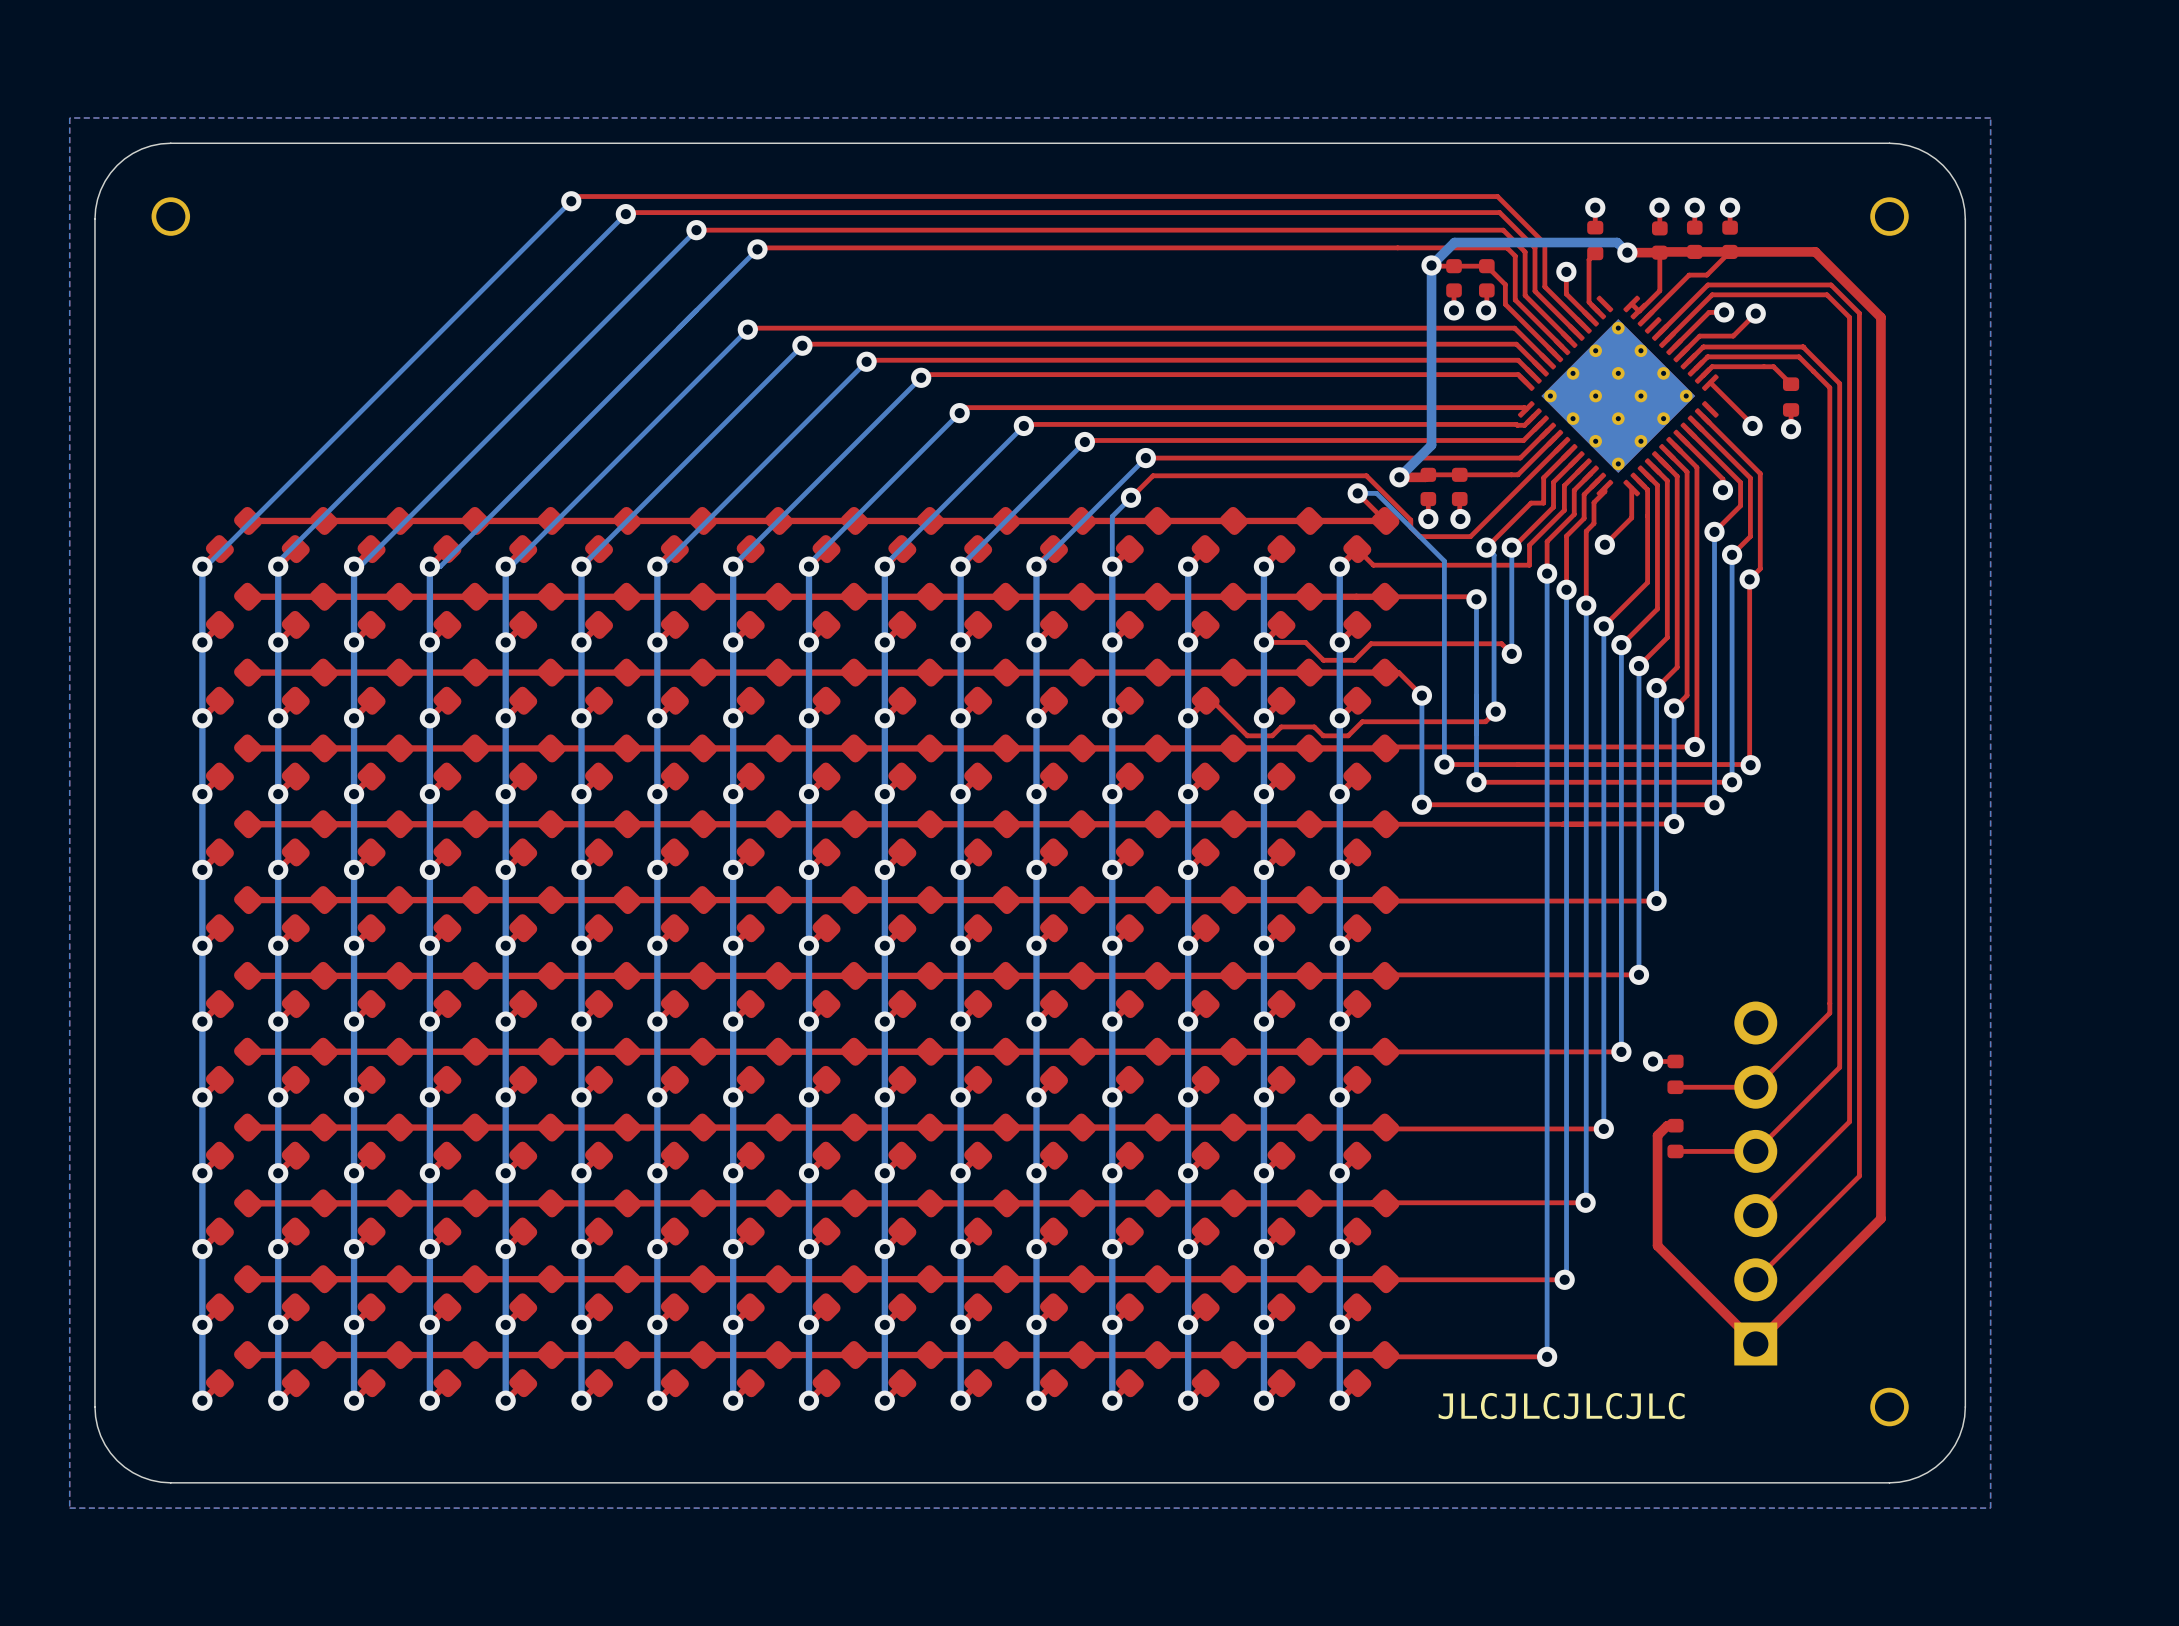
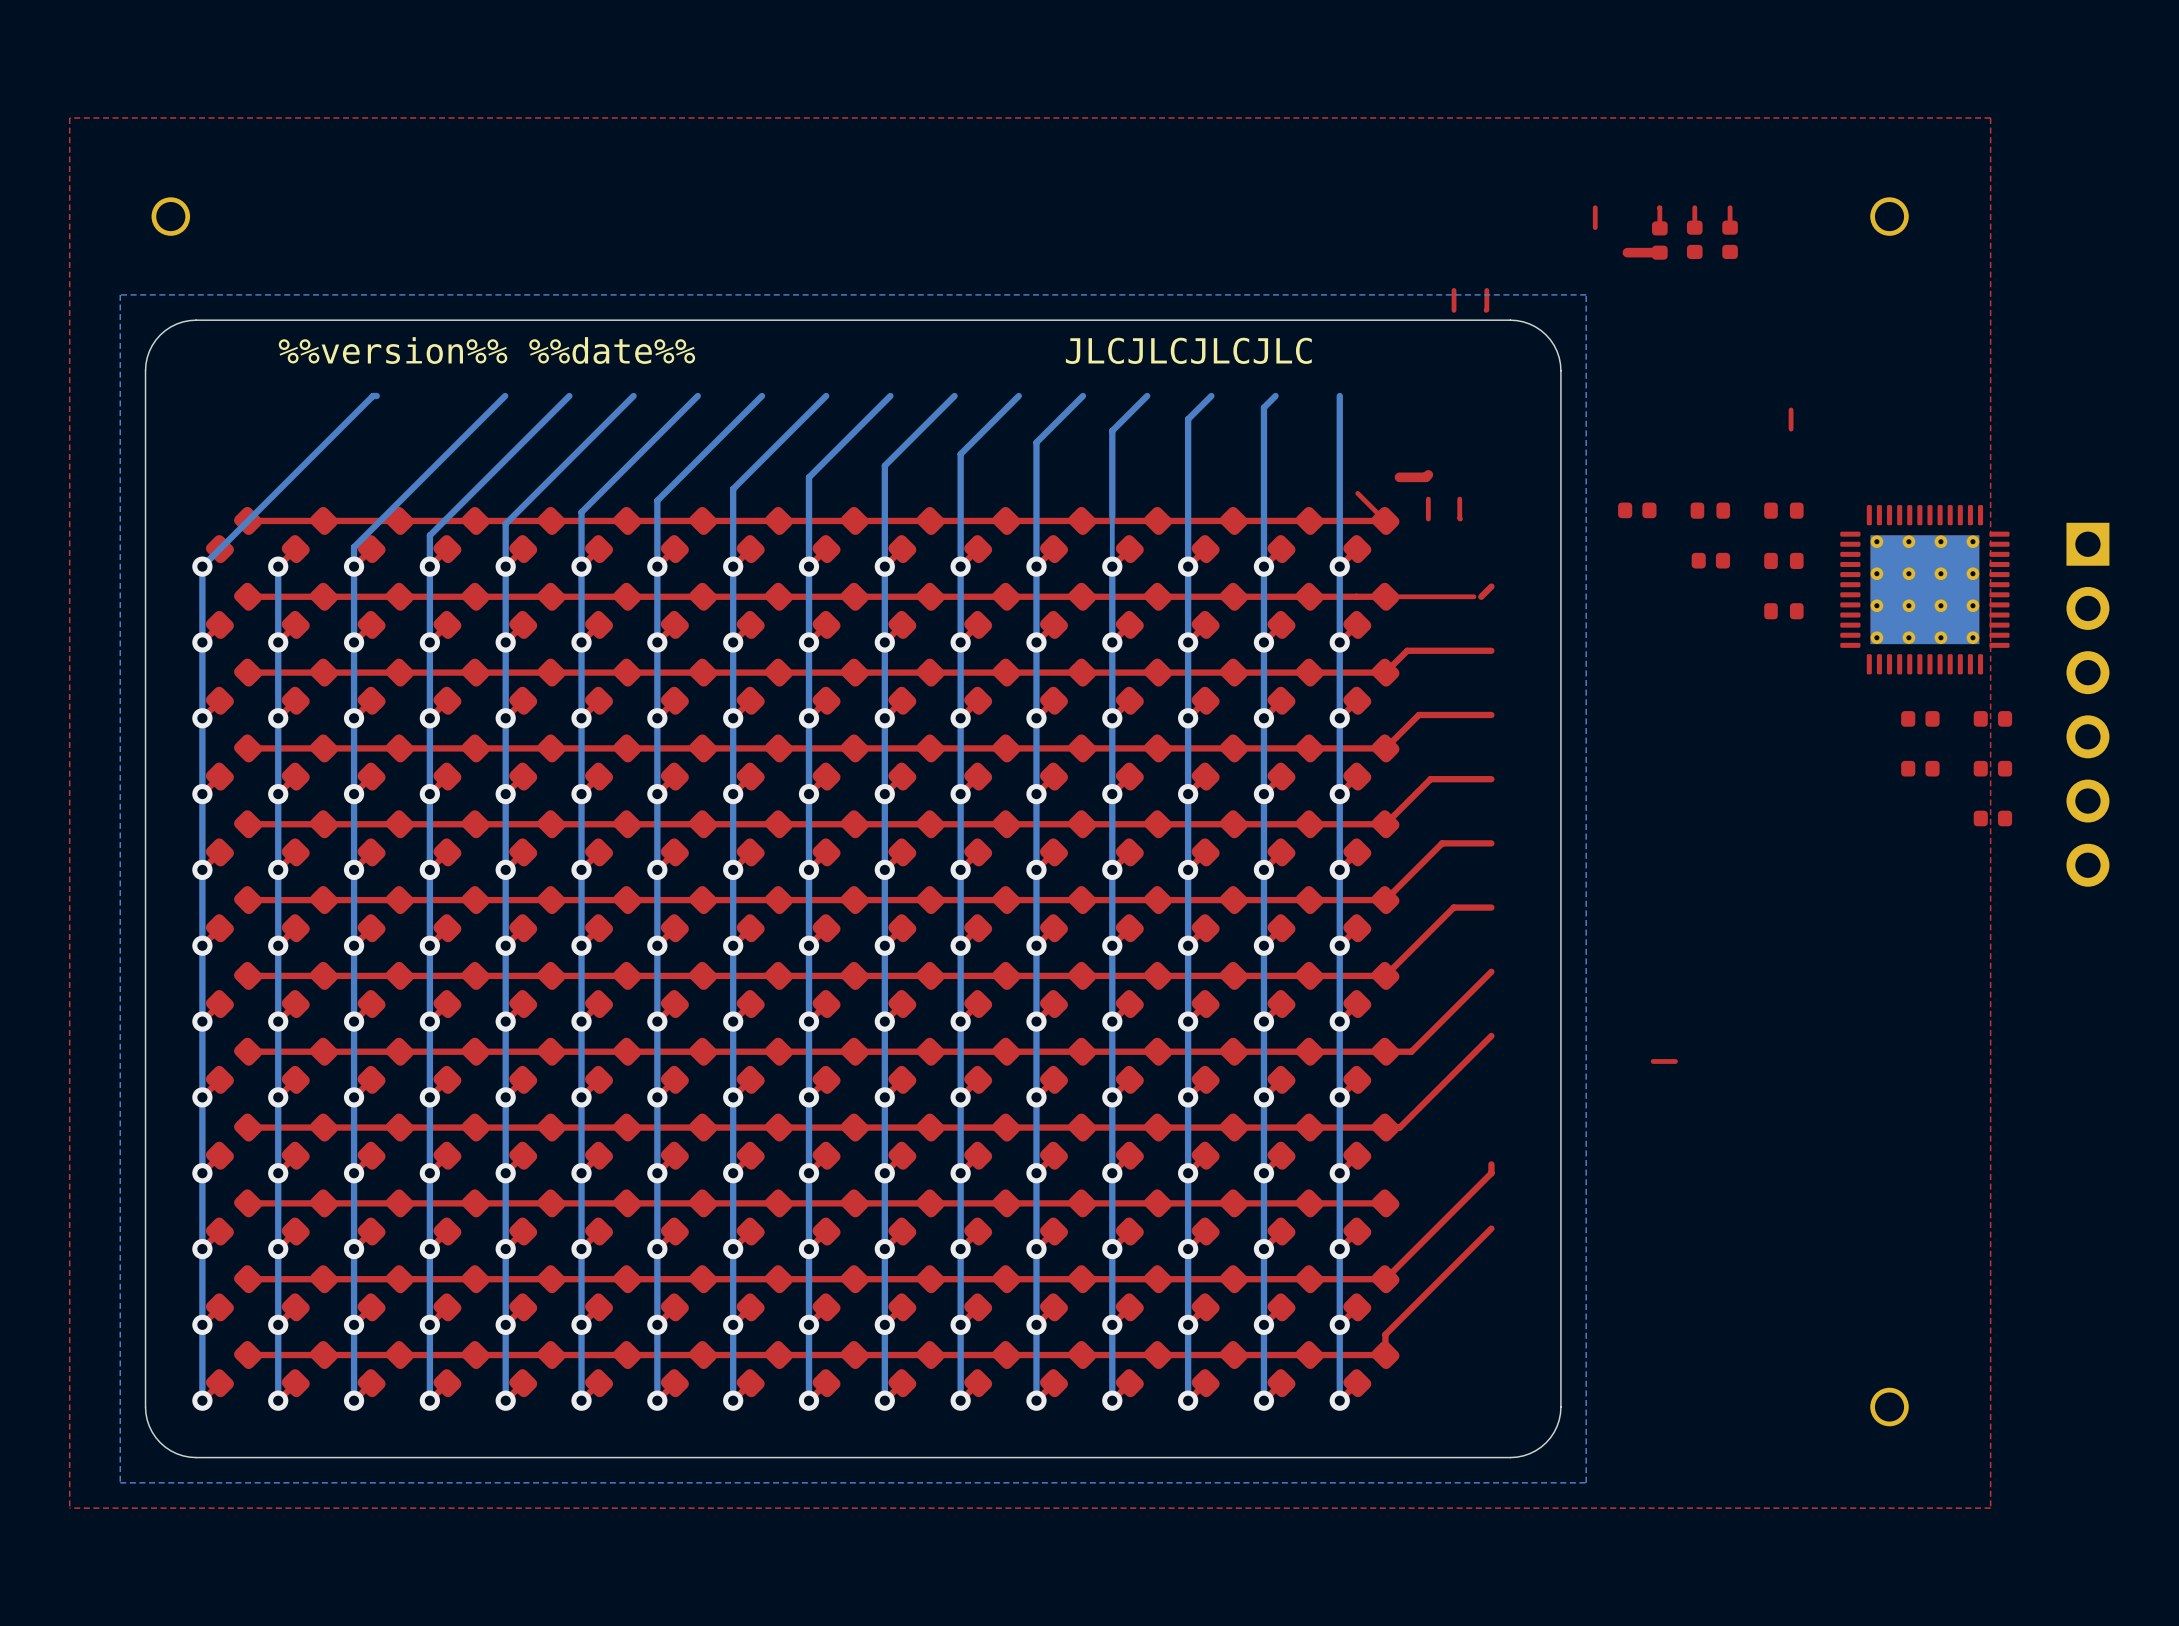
bottom zone outline: (1990, 117) (1990, 1508) (69, 1508) (69, 117) (1990, 117) -> (1586, 294) (1586, 1482) (120, 1482) (120, 294) (1586, 294)
board edge: (1889, 143) (170, 143) (151, 145) (124, 158) (105, 181) (97, 199) (94, 219) (94, 1407) (97, 1426) (110, 1453) (132, 1472) (151, 1480) (170, 1482) (1889, 1482) (1909, 1480) (1935, 1467) (1955, 1444) (1962, 1426) (1965, 1407) (1965, 219) (1959, 190) (1943, 165) (1918, 149) (1889, 143) -> (1510, 320) (1529, 324) (1546, 334) (1557, 351) (1560, 370) (1560, 1407) (1559, 1420) (1554, 1432) (1541, 1447) (1529, 1453) (1510, 1457) (196, 1457) (182, 1455) (170, 1450) (155, 1437) (149, 1426) (145, 1407) (145, 370) (149, 351) (155, 339) (165, 330) (182, 321) (196, 320) (1510, 320)
top track: (571, 201) (576, 196) (1497, 196) (1544, 243) (1544, 286) (1583, 325) -> none
bottom track: (571, 201) (205, 566) (202, 566) -> (376, 396) (373, 396) (202, 566)
via: (571, 201) -> none
via: (1595, 207) -> none
via: (1659, 207) -> none
via: (1694, 207) -> none
via: (1730, 207) -> none
top track: (625, 214) (627, 212) (1499, 212) (1534, 247) (1534, 291) (1576, 332) -> none
bottom track: (625, 214) (278, 561) (279, 566) -> none
via: (625, 214) -> none
top track: (696, 230) (1503, 230) (1525, 251) (1525, 295) (1569, 339) -> none
bottom track: (696, 230) (360, 566) (354, 566) -> (505, 396) (354, 547) (354, 566)
via: (696, 230) -> none
part: (1595, 240) -> none
top track: (757, 249) (758, 247) (1507, 247) (1515, 256) (1515, 299) (1562, 346) -> none
bottom track: (757, 249) (440, 566) (429, 566) -> (569, 396) (429, 535) (429, 566)
via: (757, 249) -> none
top track: (1730, 251) (1706, 275) (1689, 275) (1646, 318) -> none
bottom track: (1627, 252) (1617, 242) (1454, 242) (1431, 265) (1431, 445) (1399, 477) -> none
via: (1627, 252) -> none
top track: (1595, 253) (1589, 259) (1589, 302) (1597, 310) -> none
top track: (1431, 265) (1486, 266) (1505, 284) (1505, 304) (1554, 353) -> none
via: (1431, 265) -> none
top track: (1566, 271) (1566, 294) (1590, 318) -> none
via: (1566, 271) -> none
part: (1454, 278) -> none
part: (1486, 278) -> none
top track: (1631, 303) (1639, 311) (1659, 290) (1660, 251) (1815, 251) (1880, 317) (1880, 1218) (1755, 1344) (1657, 1245) (1657, 1135) (1667, 1125) (1675, 1125) -> none
via: (1454, 310) -> none
via: (1486, 310) -> none
top track: (1724, 312) (1709, 312) (1674, 346) -> none
via: (1724, 312) -> none
top track: (1755, 313) (1733, 336) (1699, 336) (1681, 354) -> none
via: (1755, 313) -> none
top track: (747, 329) (749, 328) (1514, 328) (1547, 361) -> none
bottom track: (747, 329) (510, 566) (505, 566) -> (633, 396) (505, 523) (505, 566)
via: (747, 329) -> none
top track: (1660, 332) (1707, 284) (1831, 284) (1859, 313) (1859, 1176) (1755, 1279) -> none
top track: (1667, 339) (1712, 294) (1827, 294) (1849, 317) (1849, 1121) (1755, 1215) -> none
top track: (802, 345) (803, 344) (1516, 344) (1540, 368) -> none
bottom track: (802, 345) (581, 566) -> (697, 396) (581, 512) (581, 566)
via: (802, 345) -> none
top track: (1803, 346) (1703, 346) (1689, 361) -> none
top track: (1803, 346) (1839, 383) (1839, 1067) (1755, 1151) (1675, 1151) -> none
text: none -> %%version%% %%date%% (486, 350)
text: none -> JLCJLCJLCJLC (1188, 350)
top track: (866, 361) (868, 360) (1518, 360) (1533, 375) -> none
bottom track: (866, 361) (661, 566) (657, 566) -> (761, 396) (657, 500) (657, 566)
via: (866, 361) -> none
top track: (1696, 368) (1707, 356) (1799, 356) (1829, 387) (1829, 1013) (1755, 1087) (1676, 1086) -> none
top track: (1703, 375) (1712, 366) (1773, 366) (1791, 384) -> none
top track: (921, 377) (924, 374) (1518, 374) (1526, 382) -> none
bottom track: (921, 377) (733, 565) -> (826, 396) (733, 489) (733, 566)
via: (921, 377) -> none
top track: (1710, 382) (1752, 425) -> none
bottom track: none -> (1018, 396) (960, 454) (960, 563)
bottom track: none -> (1211, 396) (1188, 419) (1188, 566)
bottom track: none -> (1275, 396) (1263, 407) (1263, 566)
bottom track: none -> (1339, 396) (1339, 566)
part: (1618, 396) -> none
part: (1791, 397) -> none
top track: (1526, 409) (1524, 407) (965, 407) (959, 413) -> none
bottom track: (959, 413) (809, 563) -> (890, 396) (809, 477) (809, 563)
via: (959, 413) -> none
top track: (1533, 416) (1524, 425) (1025, 424) (1023, 425) -> none
top track: (1703, 416) (1760, 473) (1760, 568) (1749, 579) (1750, 765) -> none
top track: (1540, 423) (1523, 440) (1086, 440) (1084, 442) -> none
top track: (1696, 423) (1750, 478) (1750, 536) (1732, 554) -> none
bottom track: (1023, 425) (884, 565) -> (954, 396) (884, 465) (884, 565)
via: (1023, 425) -> none
via: (1752, 425) -> none
via: (1791, 429) -> none
top track: (1547, 430) (1520, 458) (1145, 458) -> none
top track: (1688, 430) (1740, 482) (1740, 505) (1714, 531) -> none
top track: (1554, 438) (1517, 474) (1427, 475) -> none
top track: (1681, 438) (1722, 479) (1722, 490) -> none
bottom track: (1084, 442) (960, 566) -> none
via: (1084, 442) -> none
top track: (1562, 445) (1470, 536) (1419, 536) (1410, 527) (1410, 520) (1366, 475) (1152, 475) (1131, 497) -> none
top track: (1674, 445) (1696, 467) (1696, 744) (1694, 746) (1386, 746) -> (1491, 714) (1418, 714) (1386, 746)
top track: (1569, 452) (1543, 477) (1543, 503) (1531, 503) (1486, 547) -> none
top track: (1667, 452) (1687, 471) (1687, 695) (1674, 708) -> none
bottom track: (1145, 458) (1036, 566) -> (1082, 396) (1036, 442) (1036, 566)
via: (1145, 458) -> none
top track: (1576, 459) (1553, 482) (1553, 507) (1511, 547) -> none
top track: (1660, 459) (1677, 476) (1677, 667) (1656, 688) -> none
top track: (1583, 466) (1564, 485) (1564, 510) (1529, 545) (1529, 565) (1373, 565) (1357, 549) -> none
top track: (1653, 466) (1667, 480) (1667, 637) (1638, 666) -> none
top track: (1590, 473) (1574, 490) (1574, 514) (1547, 541) (1547, 573) -> none
top track: (1646, 473) (1657, 485) (1657, 609) (1621, 645) -> none
via: (1399, 477) -> none
top track: (1597, 480) (1584, 494) (1584, 518) (1566, 536) (1566, 589) -> none
top track: (1638, 481) (1647, 489) (1647, 582) (1603, 626) -> none
part: (1428, 486) -> none
part: (1459, 486) -> none
top track: (1604, 488) (1604, 491) (1593, 502) (1593, 523) (1586, 531) (1586, 605) -> none
top track: (1631, 488) (1631, 517) (1604, 544) -> none
via: (1722, 490) -> none
bottom track: (1357, 493) (1376, 493) (1444, 561) (1444, 764) -> none
via: (1357, 493) -> none
bottom track: (1131, 497) (1112, 516) -> (1147, 396) (1112, 430) (1112, 516)
via: (1131, 497) -> none
part: none -> (1637, 510)
part: none -> (1710, 510)
part: none -> (1783, 510)
via: (1428, 519) -> none
via: (1460, 519) -> none
bottom track: (1714, 531) (1714, 805) -> none
via: (1714, 531) -> none
via: (1604, 544) -> none
bottom track: (1486, 547) (1494, 555) (1494, 709) (1495, 711) -> none
via: (1486, 547) -> none
bottom track: (1511, 547) (1511, 653) -> none
via: (1511, 547) -> none
bottom track: (1732, 554) (1732, 782) -> none
via: (1732, 554) -> none
part: none -> (1710, 560)
part: none -> (1783, 560)
bottom track: (1547, 573) (1547, 1356) -> none
via: (1547, 573) -> none
via: (1749, 579) -> none
top track: none -> (1491, 586) (1481, 596)
bottom track: (1566, 589) (1566, 1277) (1564, 1279) -> none
via: (1566, 589) -> none
part: none -> (1924, 589)
bottom track: (1476, 599) (1476, 782) -> none
via: (1476, 599) -> none
bottom track: (1586, 605) (1585, 1202) -> none
via: (1586, 605) -> none
part: none -> (1783, 611)
bottom track: (1603, 626) (1603, 1128) -> none
via: (1603, 626) -> none
top track: (1263, 642) (1305, 642) (1323, 660) (1354, 660) (1371, 643) (1501, 643) (1511, 653) -> none
bottom track: (1621, 645) (1621, 1051) -> none
via: (1621, 645) -> none
via: (1511, 653) -> none
bottom track: (1638, 666) (1638, 974) -> none
via: (1638, 666) -> none
top track: (1385, 672) (1398, 672) (1421, 695) -> (1385, 672) (1407, 650) (1491, 650)
bottom track: (1656, 688) (1656, 901) -> none
via: (1656, 688) -> none
bottom track: (1421, 695) (1421, 804) -> none
via: (1421, 695) -> none
top track: (1205, 700) (1212, 700) (1247, 735) (1272, 735) (1281, 726) (1314, 726) (1323, 735) (1348, 735) (1362, 721) (1485, 721) (1495, 711) -> none
bottom track: (1674, 708) (1674, 823) -> none
via: (1674, 708) -> none
via: (1495, 711) -> none
part: none -> (1920, 718)
part: none -> (1992, 718)
via: (1694, 746) -> none
via: (1444, 764) -> none
top track: (1750, 764) (1442, 764) -> none
via: (1750, 765) -> none
part: none -> (1920, 768)
part: none -> (1992, 768)
via: (1476, 782) -> none
top track: (1732, 782) (1476, 782) -> none
via: (1732, 782) -> none
top track: (1421, 804) (1714, 805) -> none
via: (1421, 804) -> none
via: (1714, 805) -> none
part: none -> (1992, 818)
top track: (1674, 823) (1563, 823) -> none
via: (1674, 823) -> none
top track: (1585, 824) (1385, 824) -> (1491, 779) (1430, 779) (1385, 824)
top track: (1385, 900) (1656, 901) -> (1385, 900) (1442, 843) (1491, 843)
via: (1656, 901) -> none
top track: none -> (1491, 907) (1453, 907) (1385, 975)
top track: none -> (1491, 971) (1411, 1051) (1387, 1051)
top track: (1638, 974) (1386, 974) -> none
via: (1638, 974) -> none
top track: (1621, 1051) (1385, 1051) -> none
via: (1621, 1051) -> none
via: (1653, 1061) -> none
part: (1675, 1074) -> none
top track: (1385, 1127) (1603, 1128) -> (1385, 1127) (1399, 1127) (1491, 1035)
via: (1603, 1128) -> none
part: (1675, 1138) -> none
part rotation: 0° (1755, 1183) -> 180° (2087, 704)
part position: (1755, 1183) -> (2087, 704)
top track: (1585, 1202) (1373, 1203) -> none
via: (1585, 1202) -> none
top track: none -> (1491, 1228) (1385, 1334) (1385, 1355)
top track: (1385, 1279) (1564, 1279) -> (1385, 1279) (1491, 1173) (1491, 1164)
via: (1564, 1279) -> none
top track: (1388, 1355) (1385, 1355) (1387, 1356) (1547, 1356) -> none
via: (1547, 1356) -> none
text: JLCJLCJLCJLC (1561, 1406) -> none

